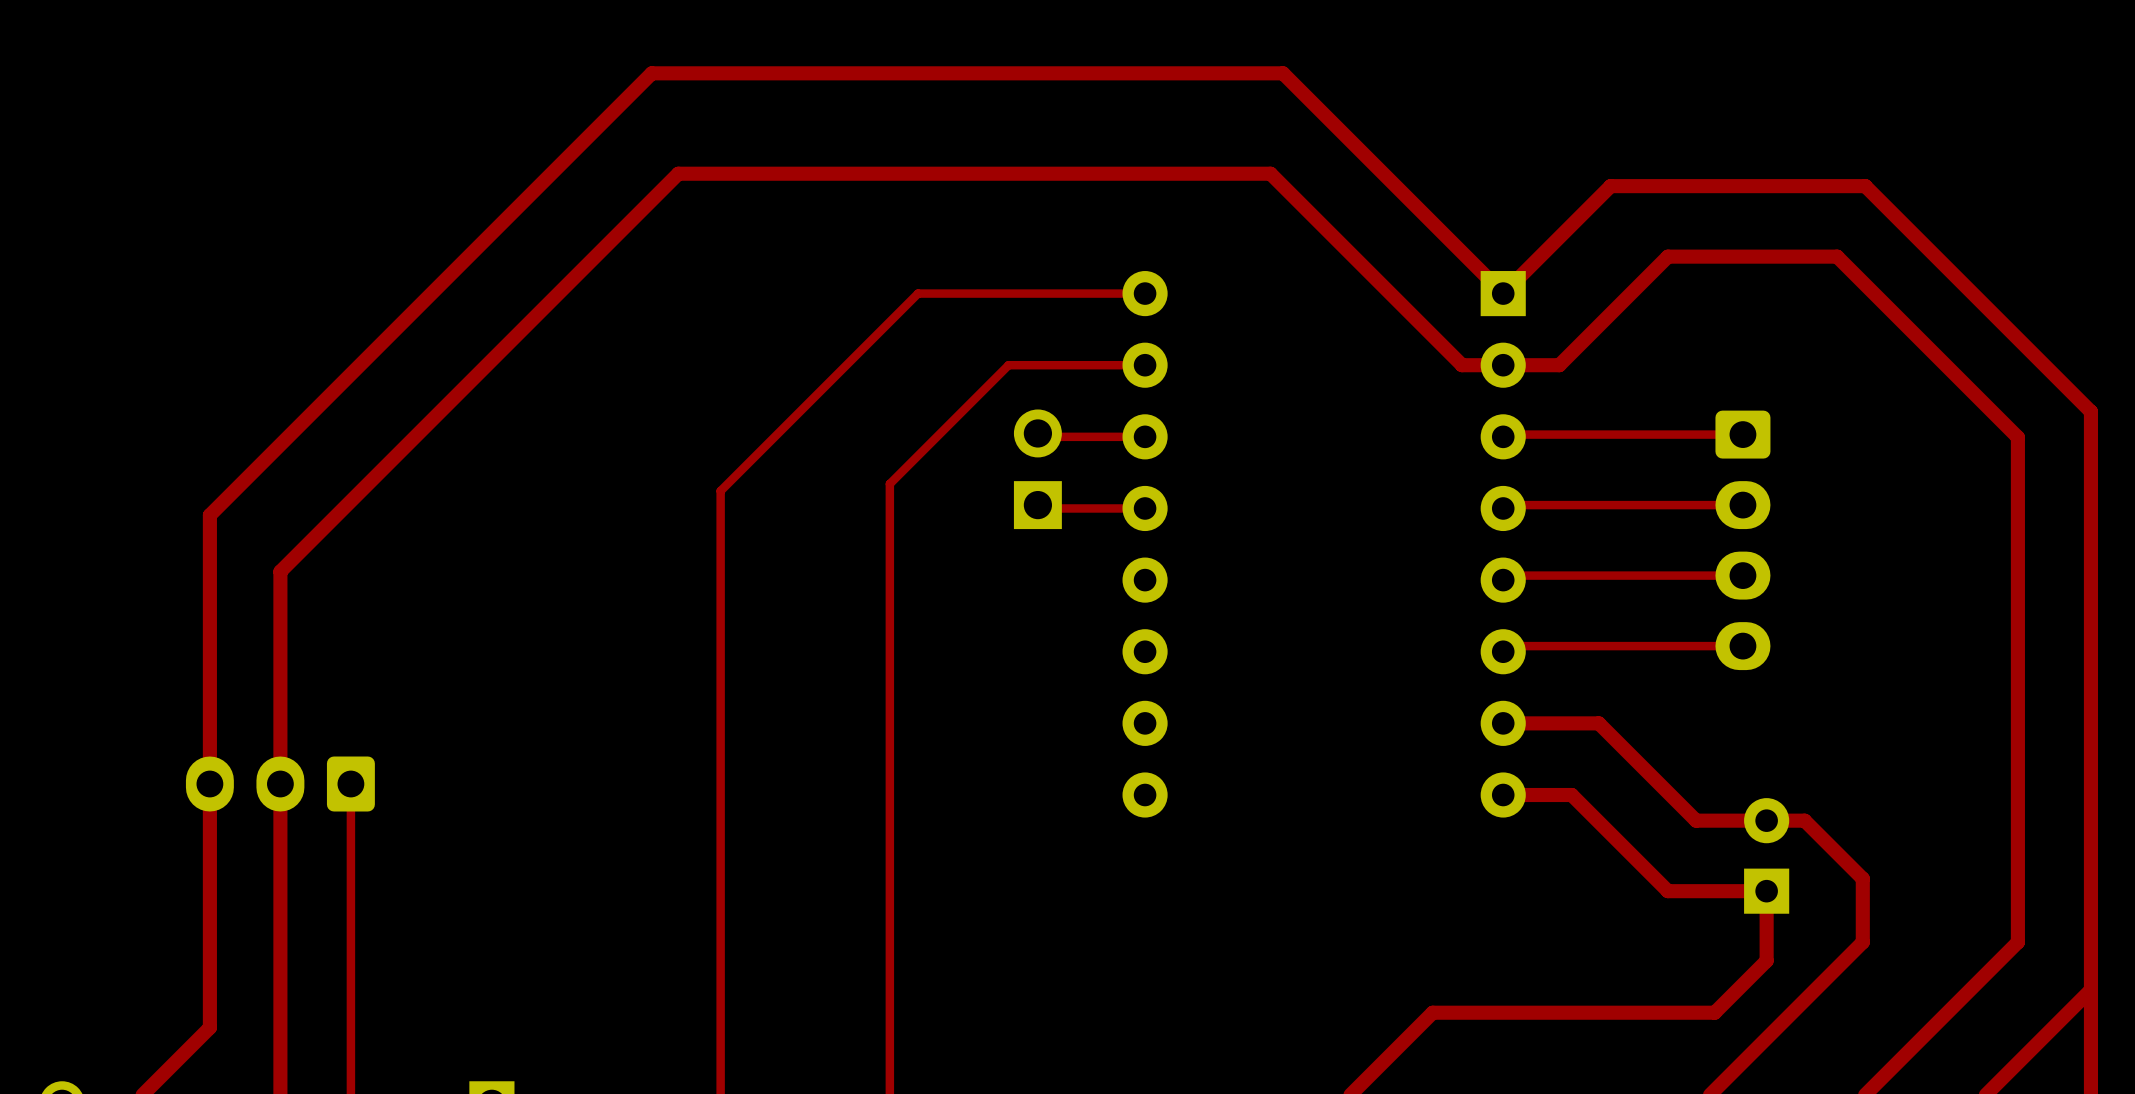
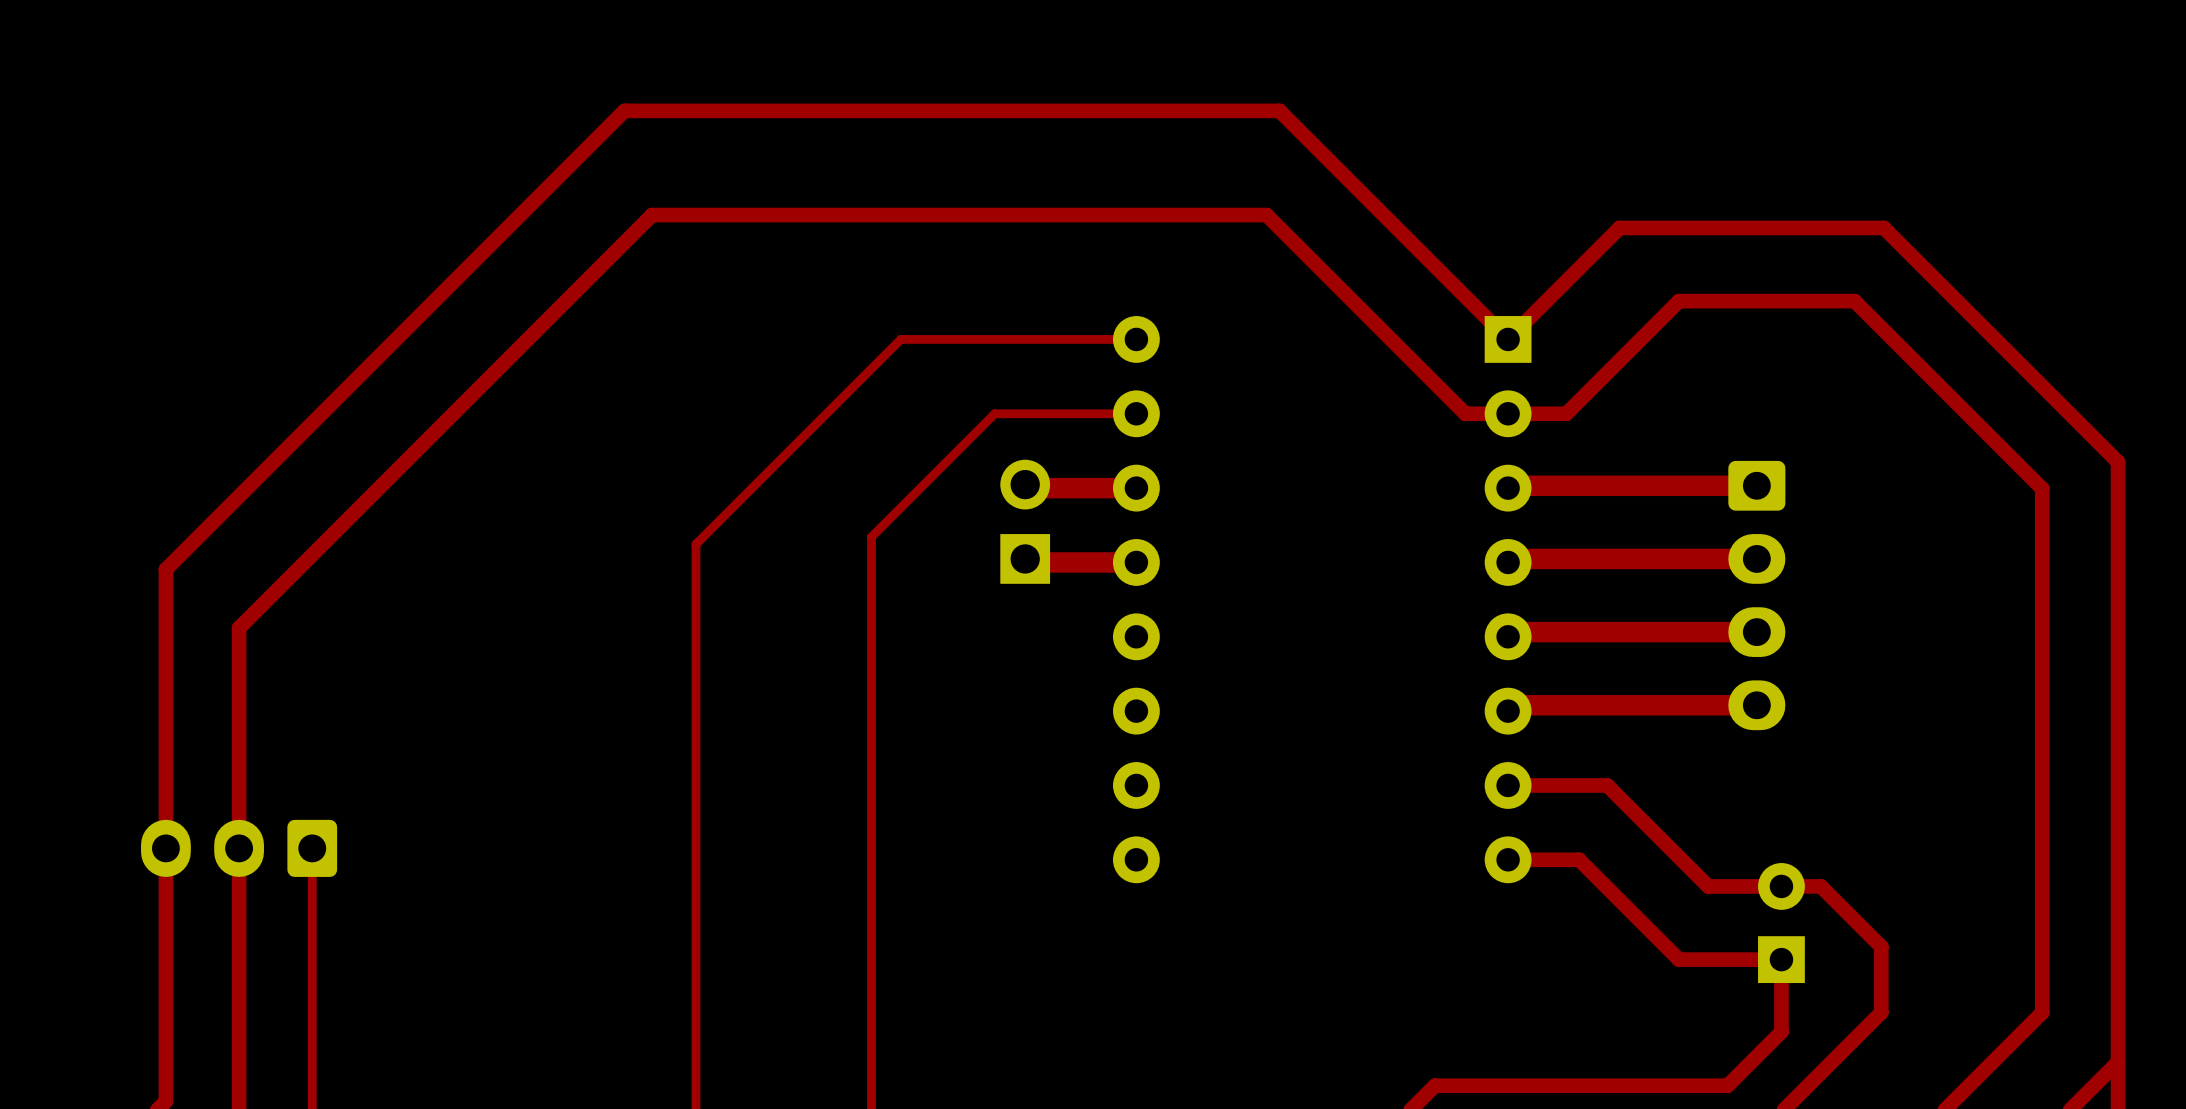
top track width: thin (1037, 433) (1041, 436) (1145, 436) -> thick (1025, 484) (1028, 488) (1136, 488)
top track width: thin (1742, 434) (1505, 434) -> thick (1756, 485) (1510, 485)
top track width: thin (1037, 505) (1041, 508) (1145, 508) -> thick (1025, 558) (1028, 562) (1136, 562)
top track width: thin (1742, 505) (1506, 505) -> thick (1756, 558) (1511, 558)
top track width: thin (1742, 575) (1507, 575) -> thick (1756, 632) (1512, 632)
top track width: thin (1742, 646) (1508, 646) -> thick (1756, 705) (1513, 705)

